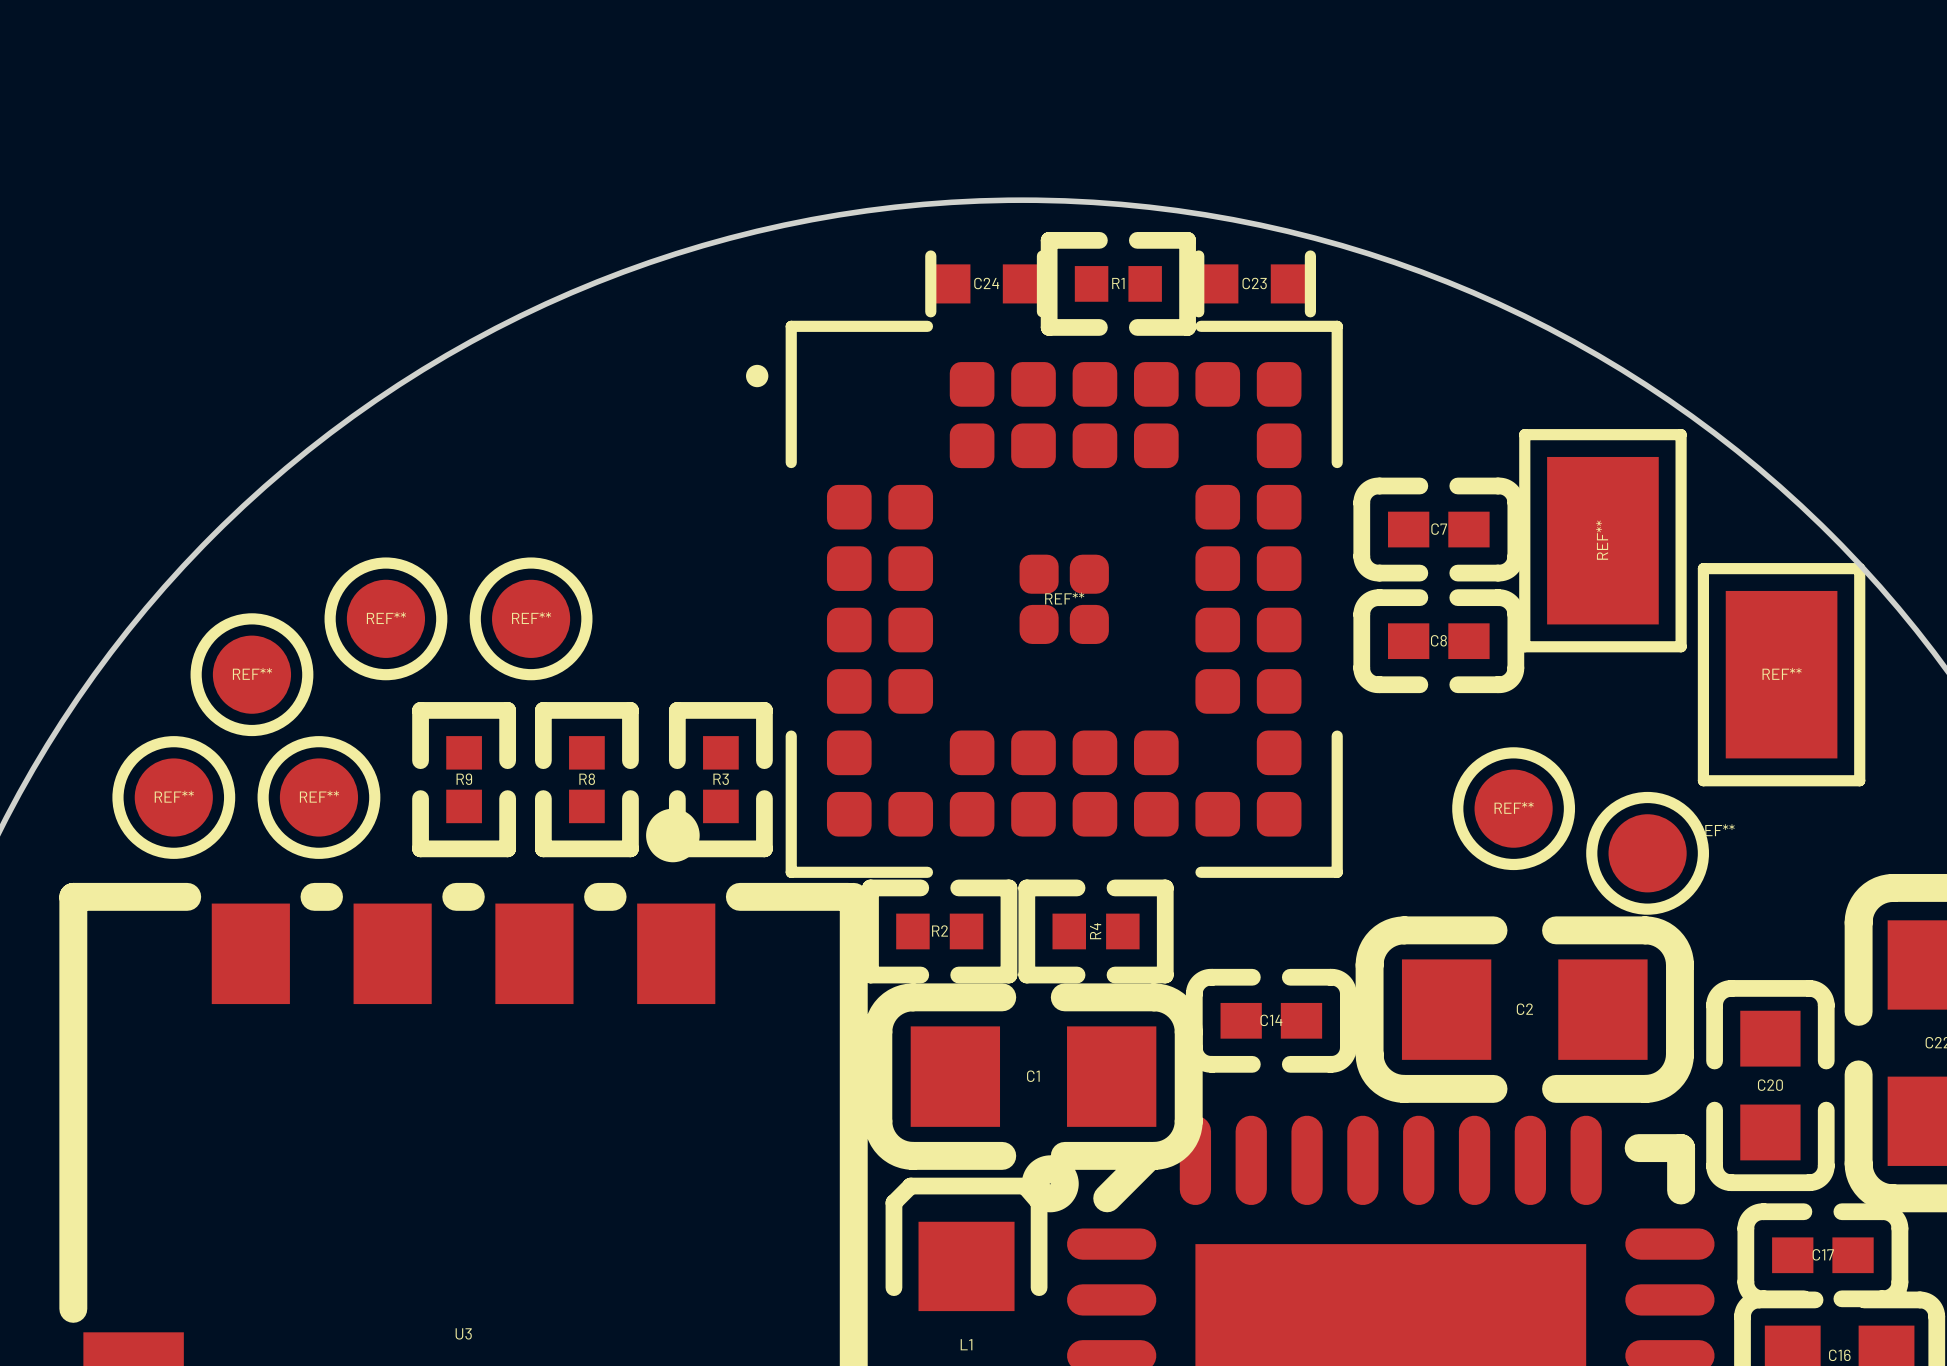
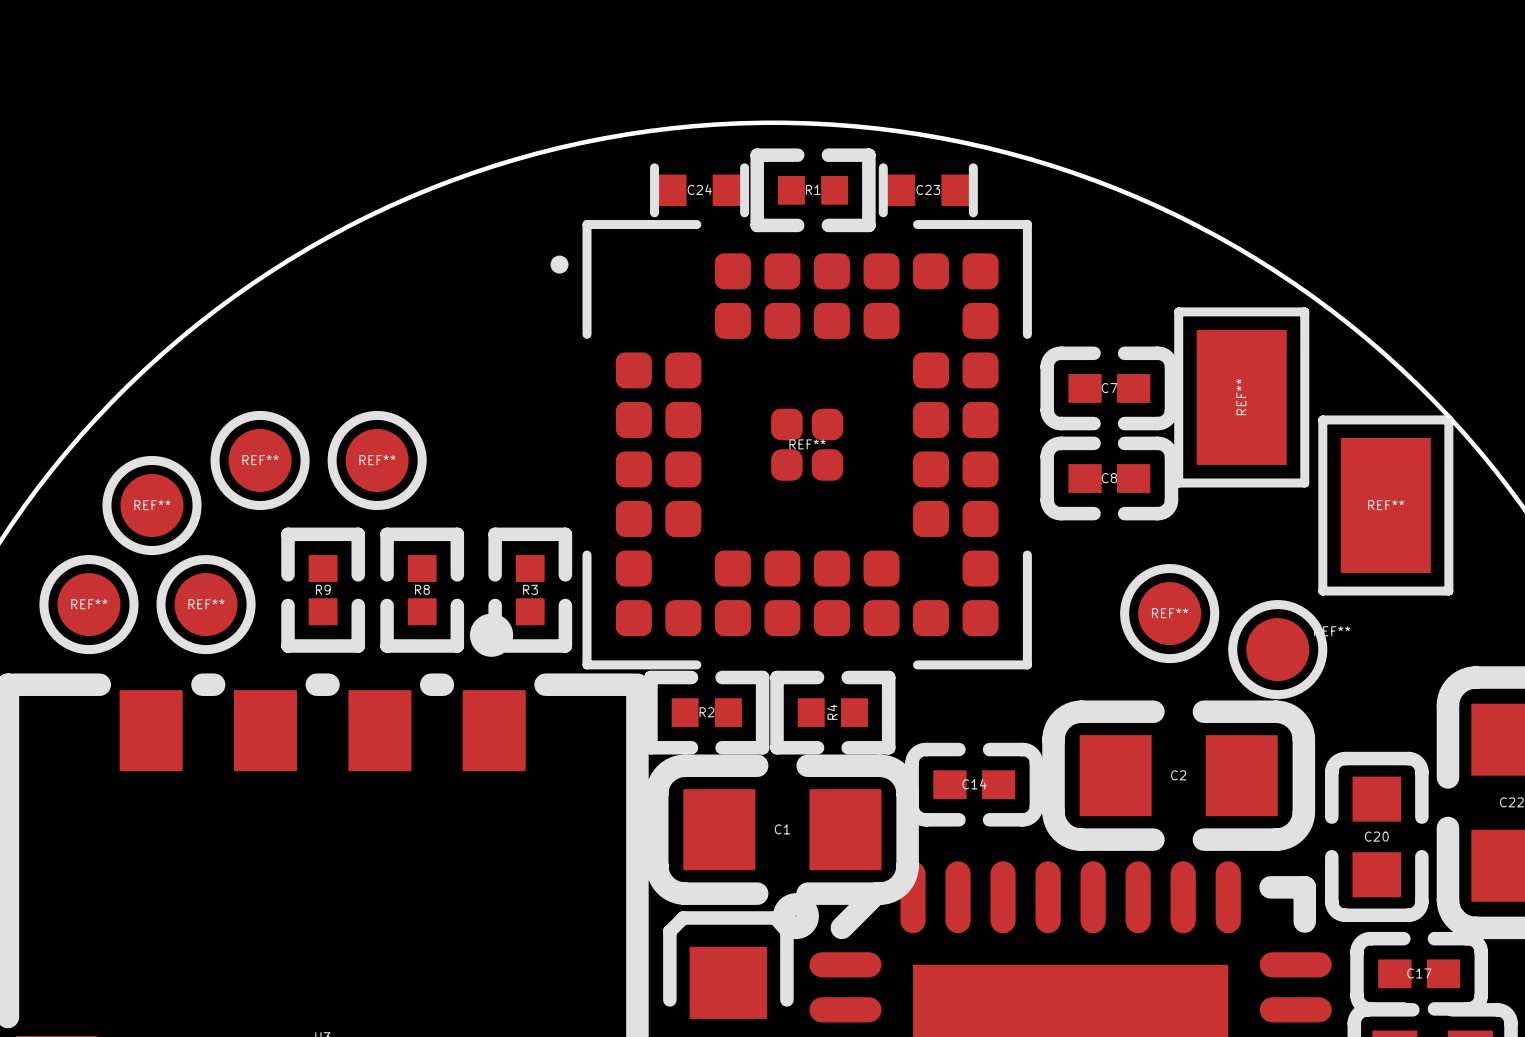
C24 position: (986, 283) -> (699, 190)
R1 position: (1118, 283) -> (813, 190)
C23 position: (1254, 283) -> (928, 190)

